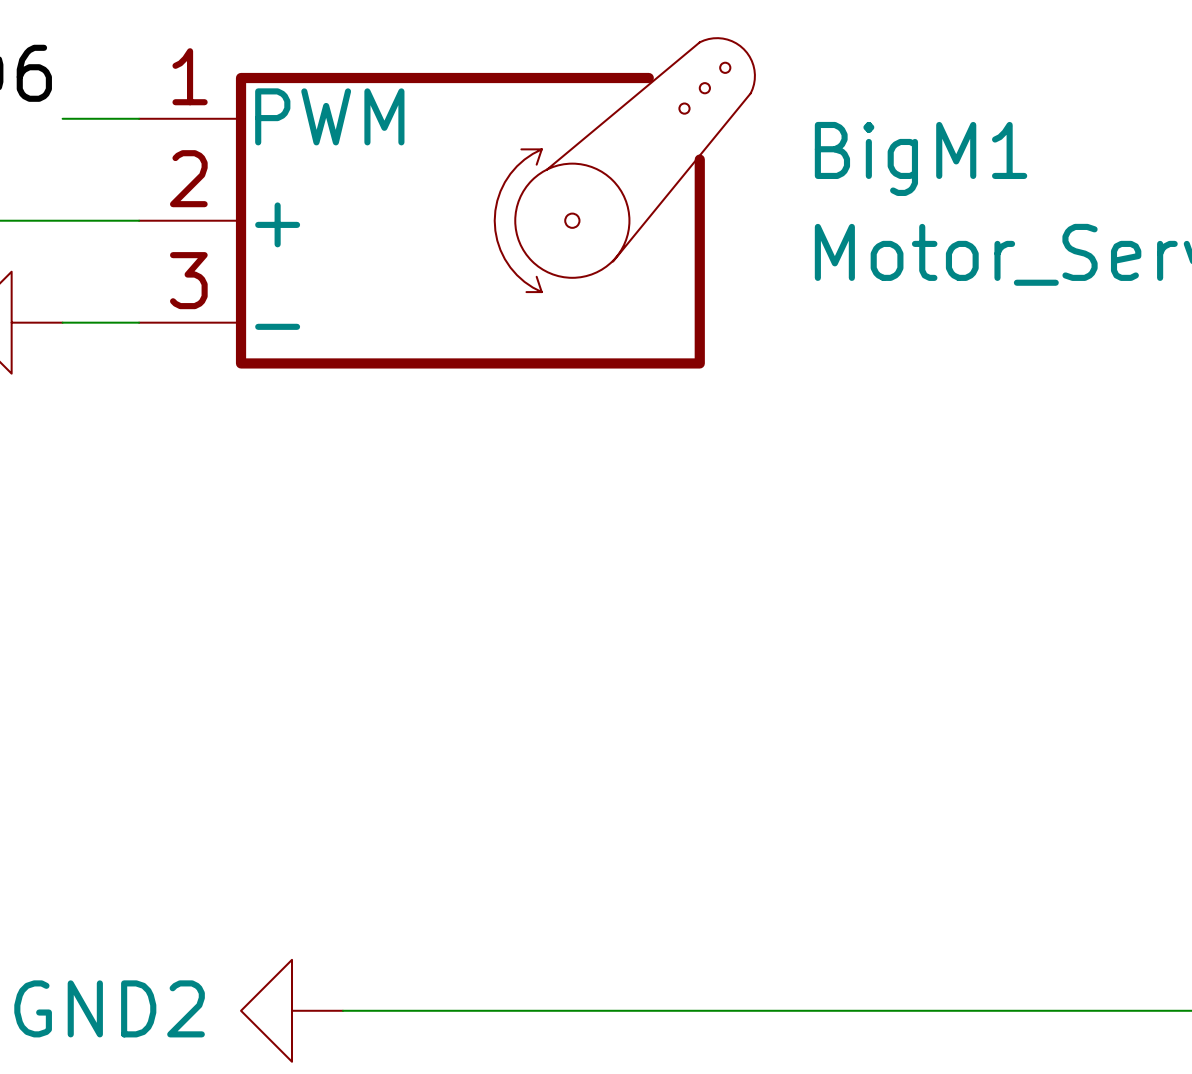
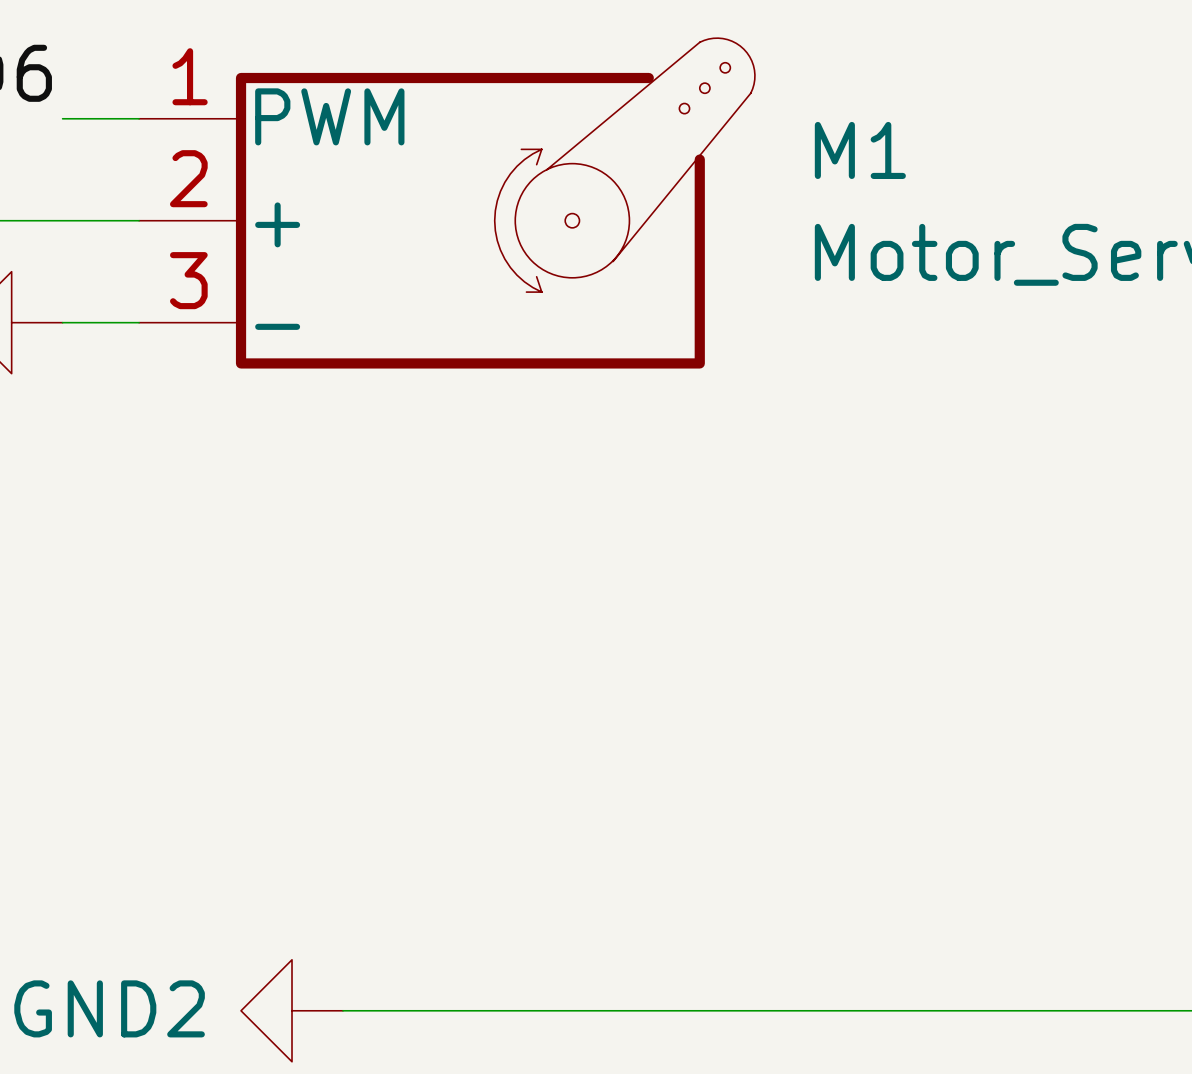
BigM1 name: BigM1 (921, 158) -> M1 (860, 150)

